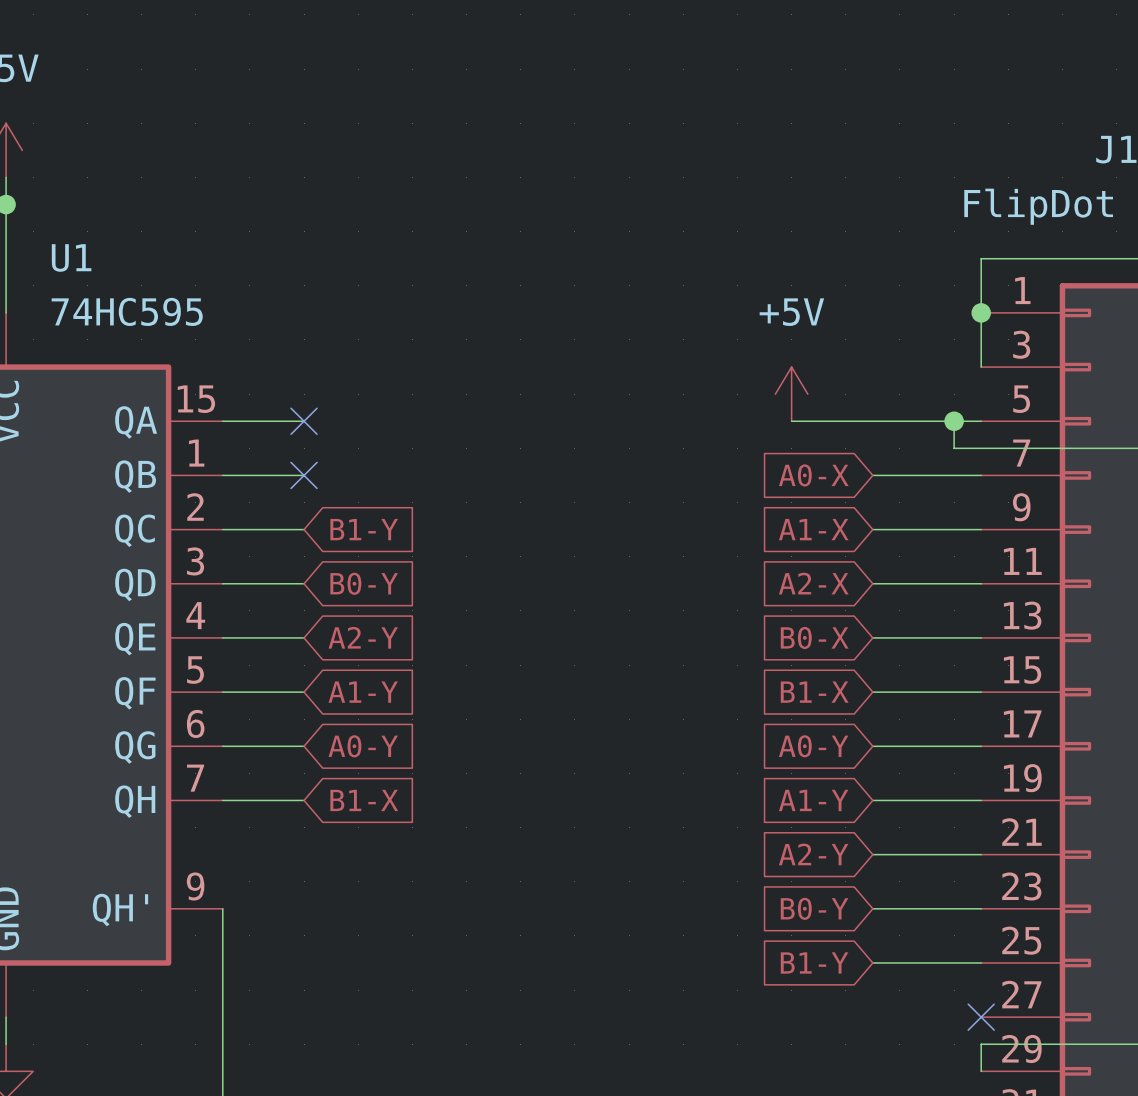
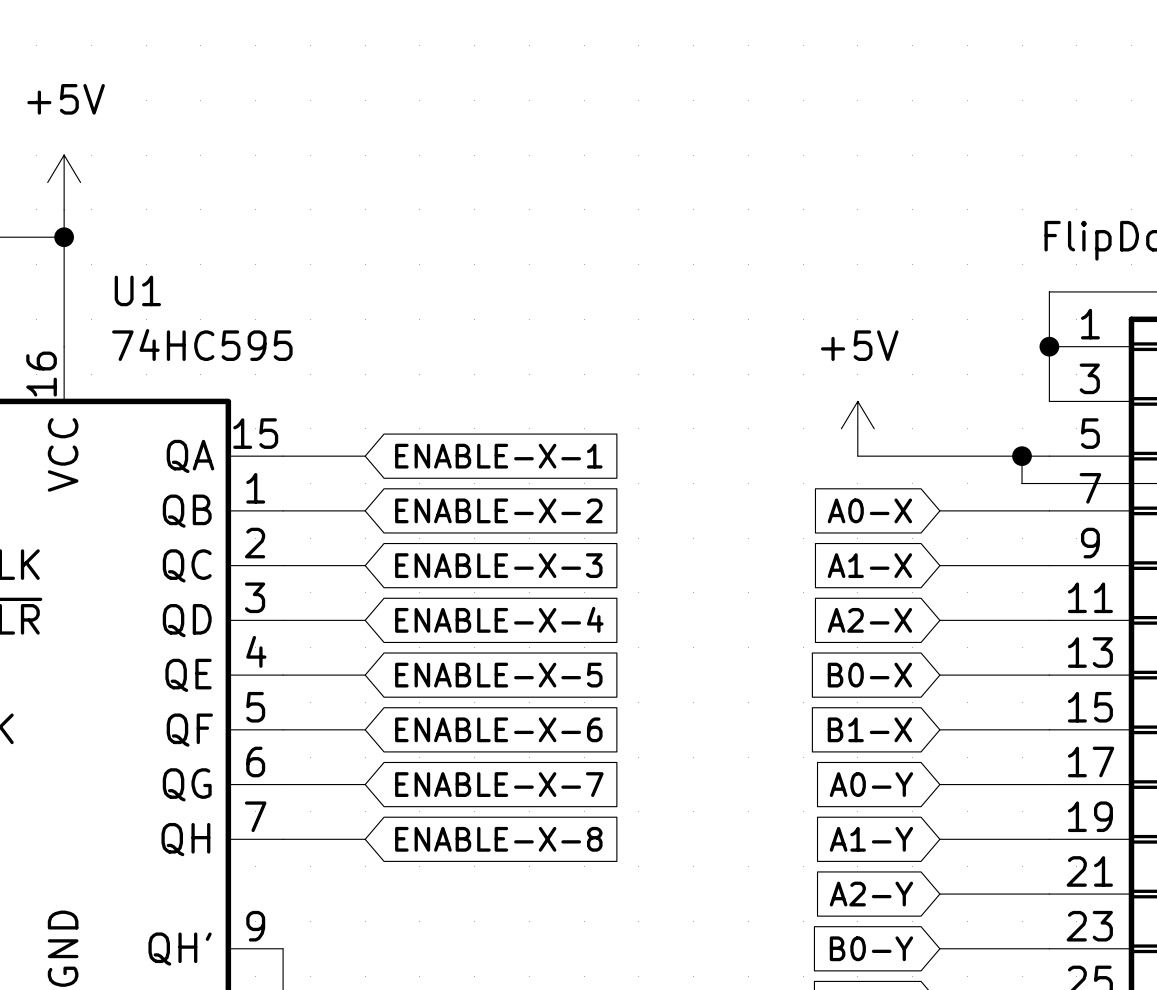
no-connect mark: (304, 421) -> none
global label: none -> ENABLE-X-1 (498, 456)
no-connect mark: (304, 475) -> none
global label: none -> ENABLE-X-2 (498, 510)
global label: B1-Y (364, 529) -> ENABLE-X-3 (498, 565)
global label: B0-Y (364, 583) -> ENABLE-X-4 (499, 619)
global label: A2-Y (363, 637) -> ENABLE-X-5 (498, 675)
global label: A1-Y (363, 692) -> ENABLE-X-6 (498, 729)
global label: A0-Y (363, 746) -> ENABLE-X-7 (499, 784)
global label: B1-X (364, 800) -> ENABLE-X-8 (498, 839)

